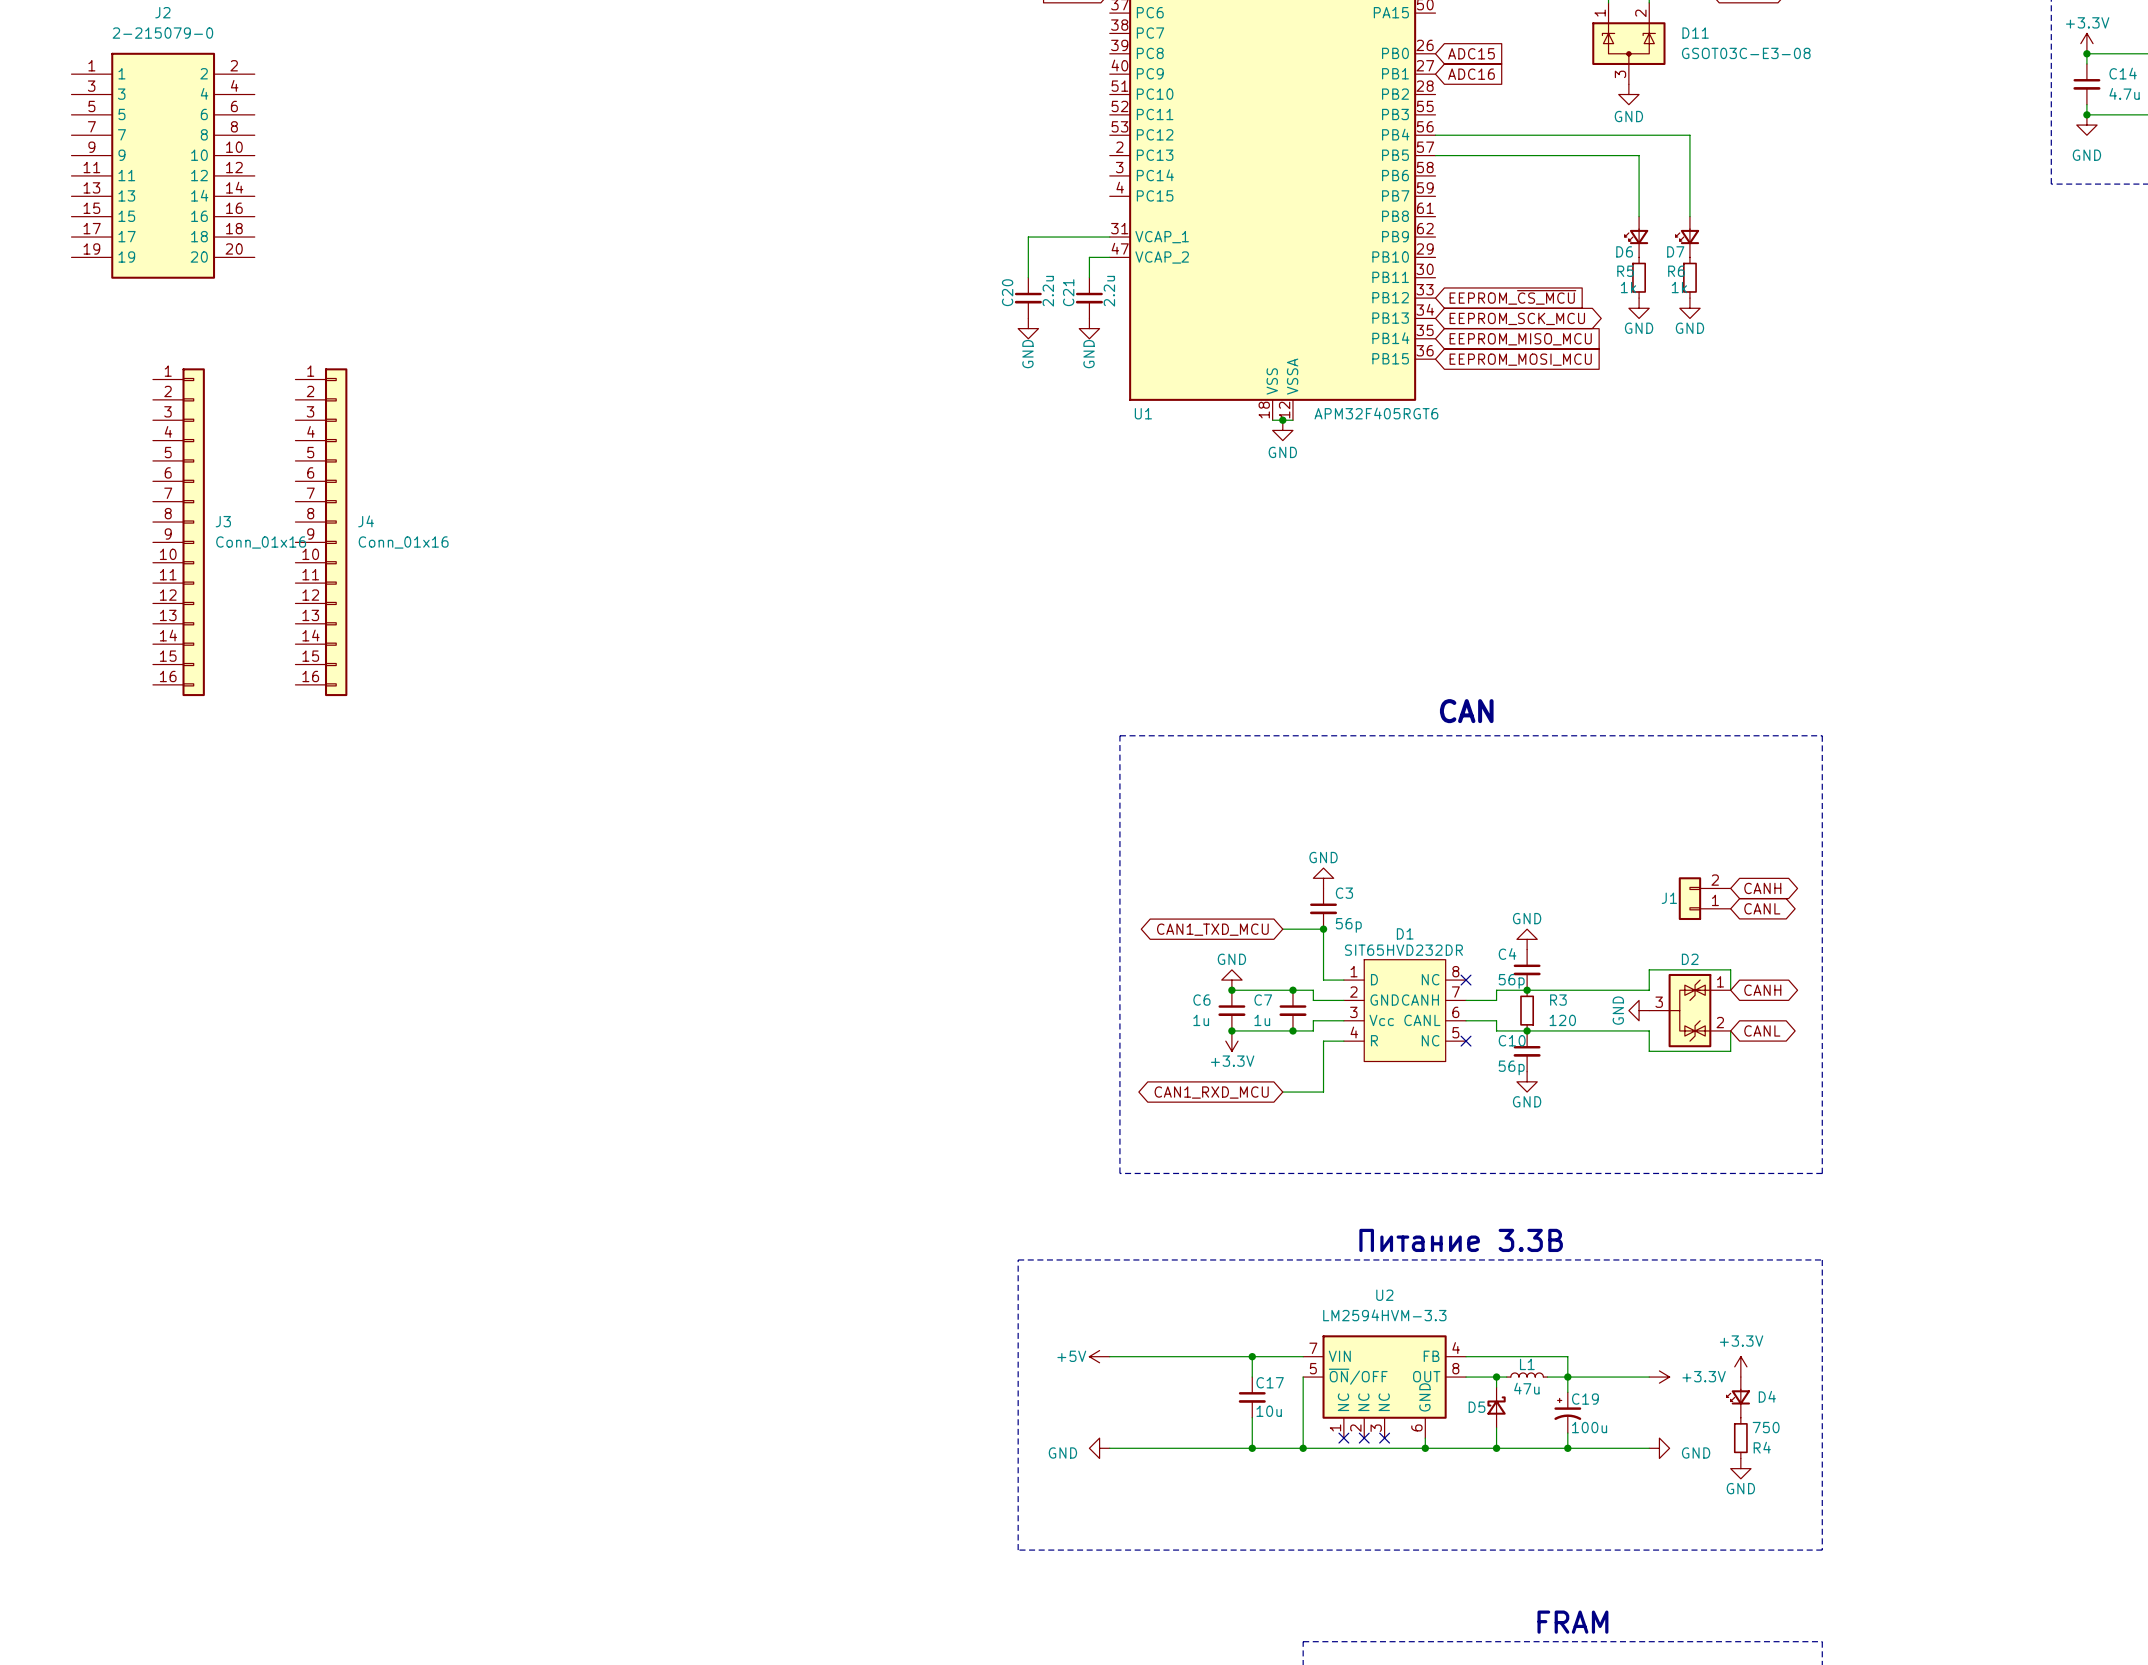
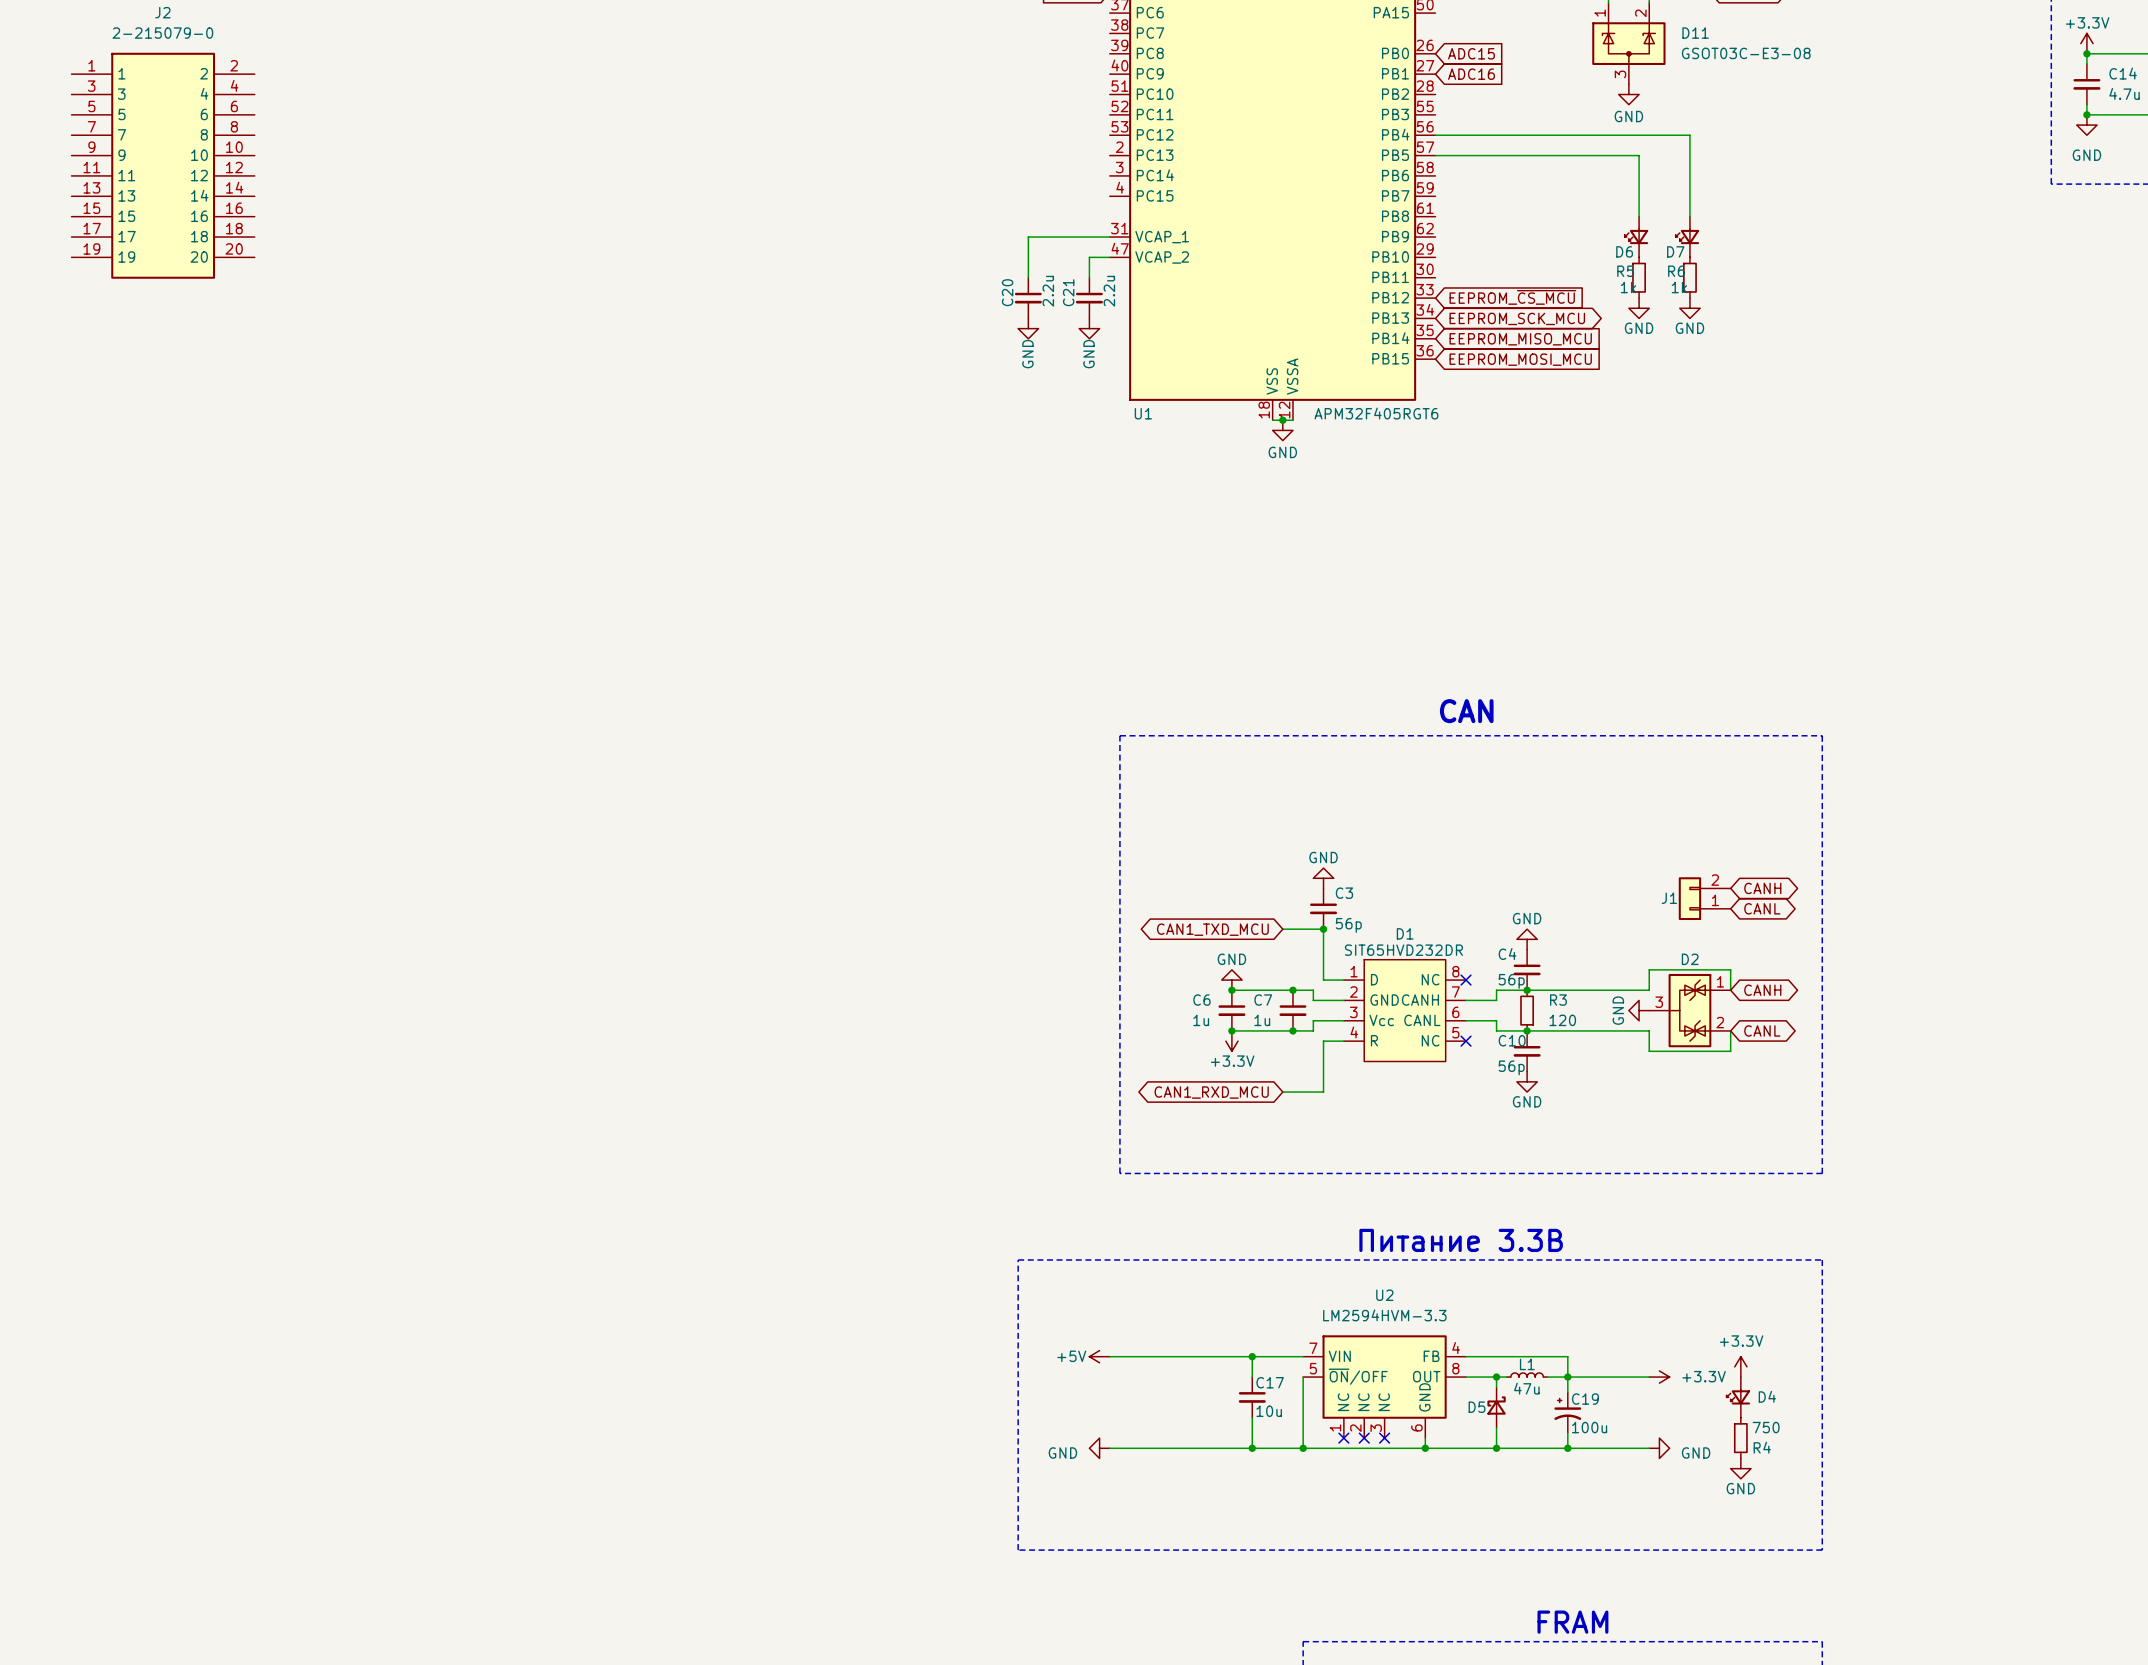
J3: Conn_01x16 (178, 532) -> none
J4: Conn_01x16 (321, 532) -> none

